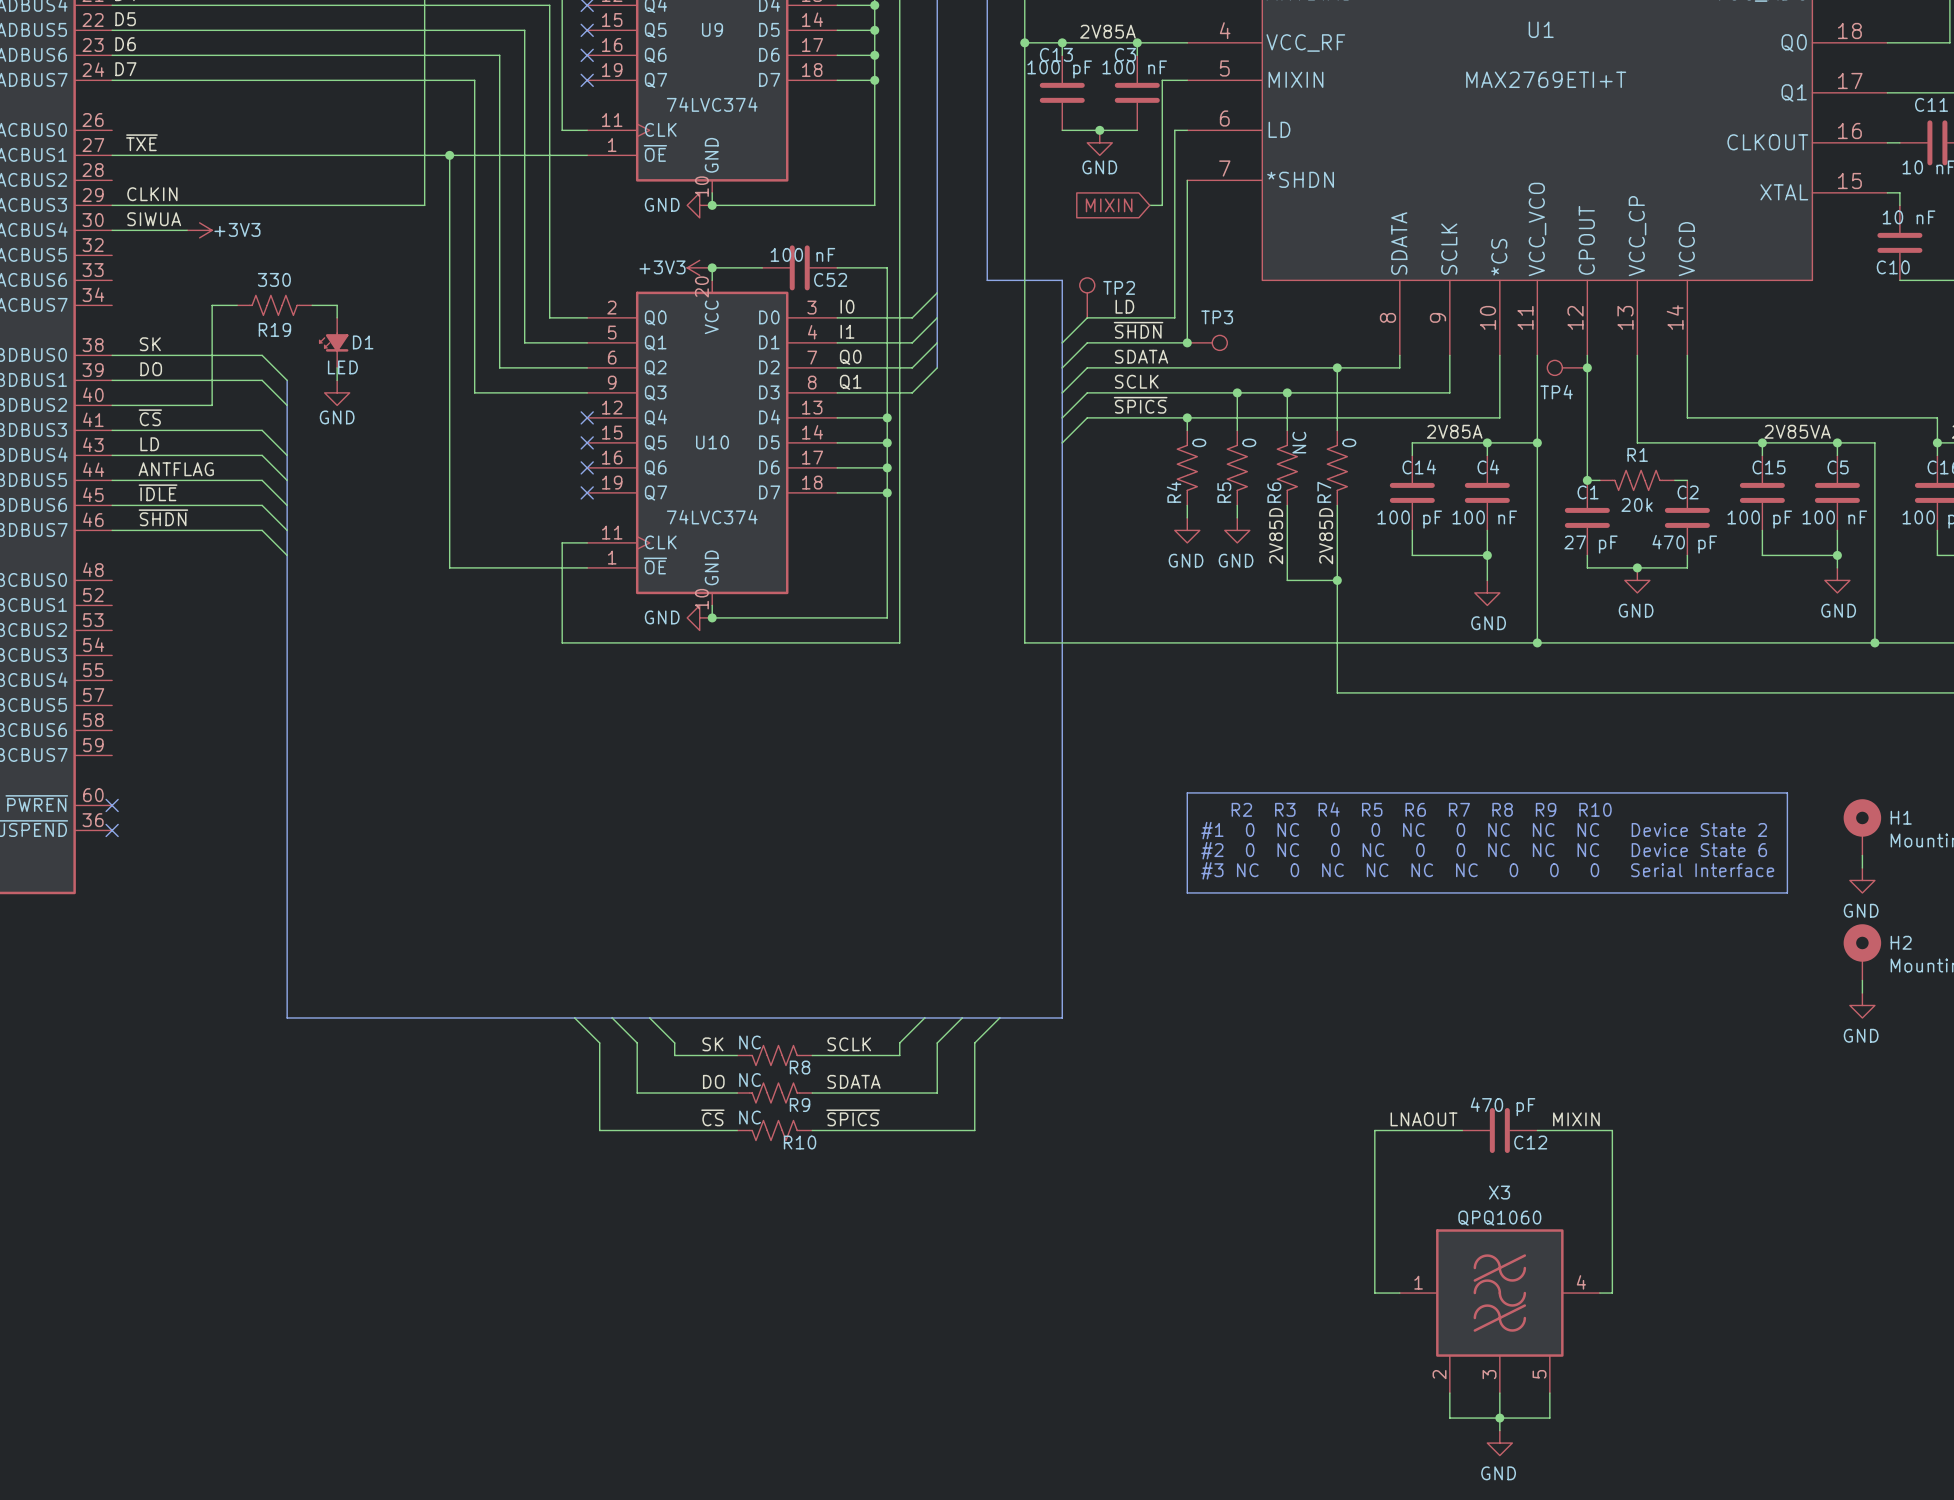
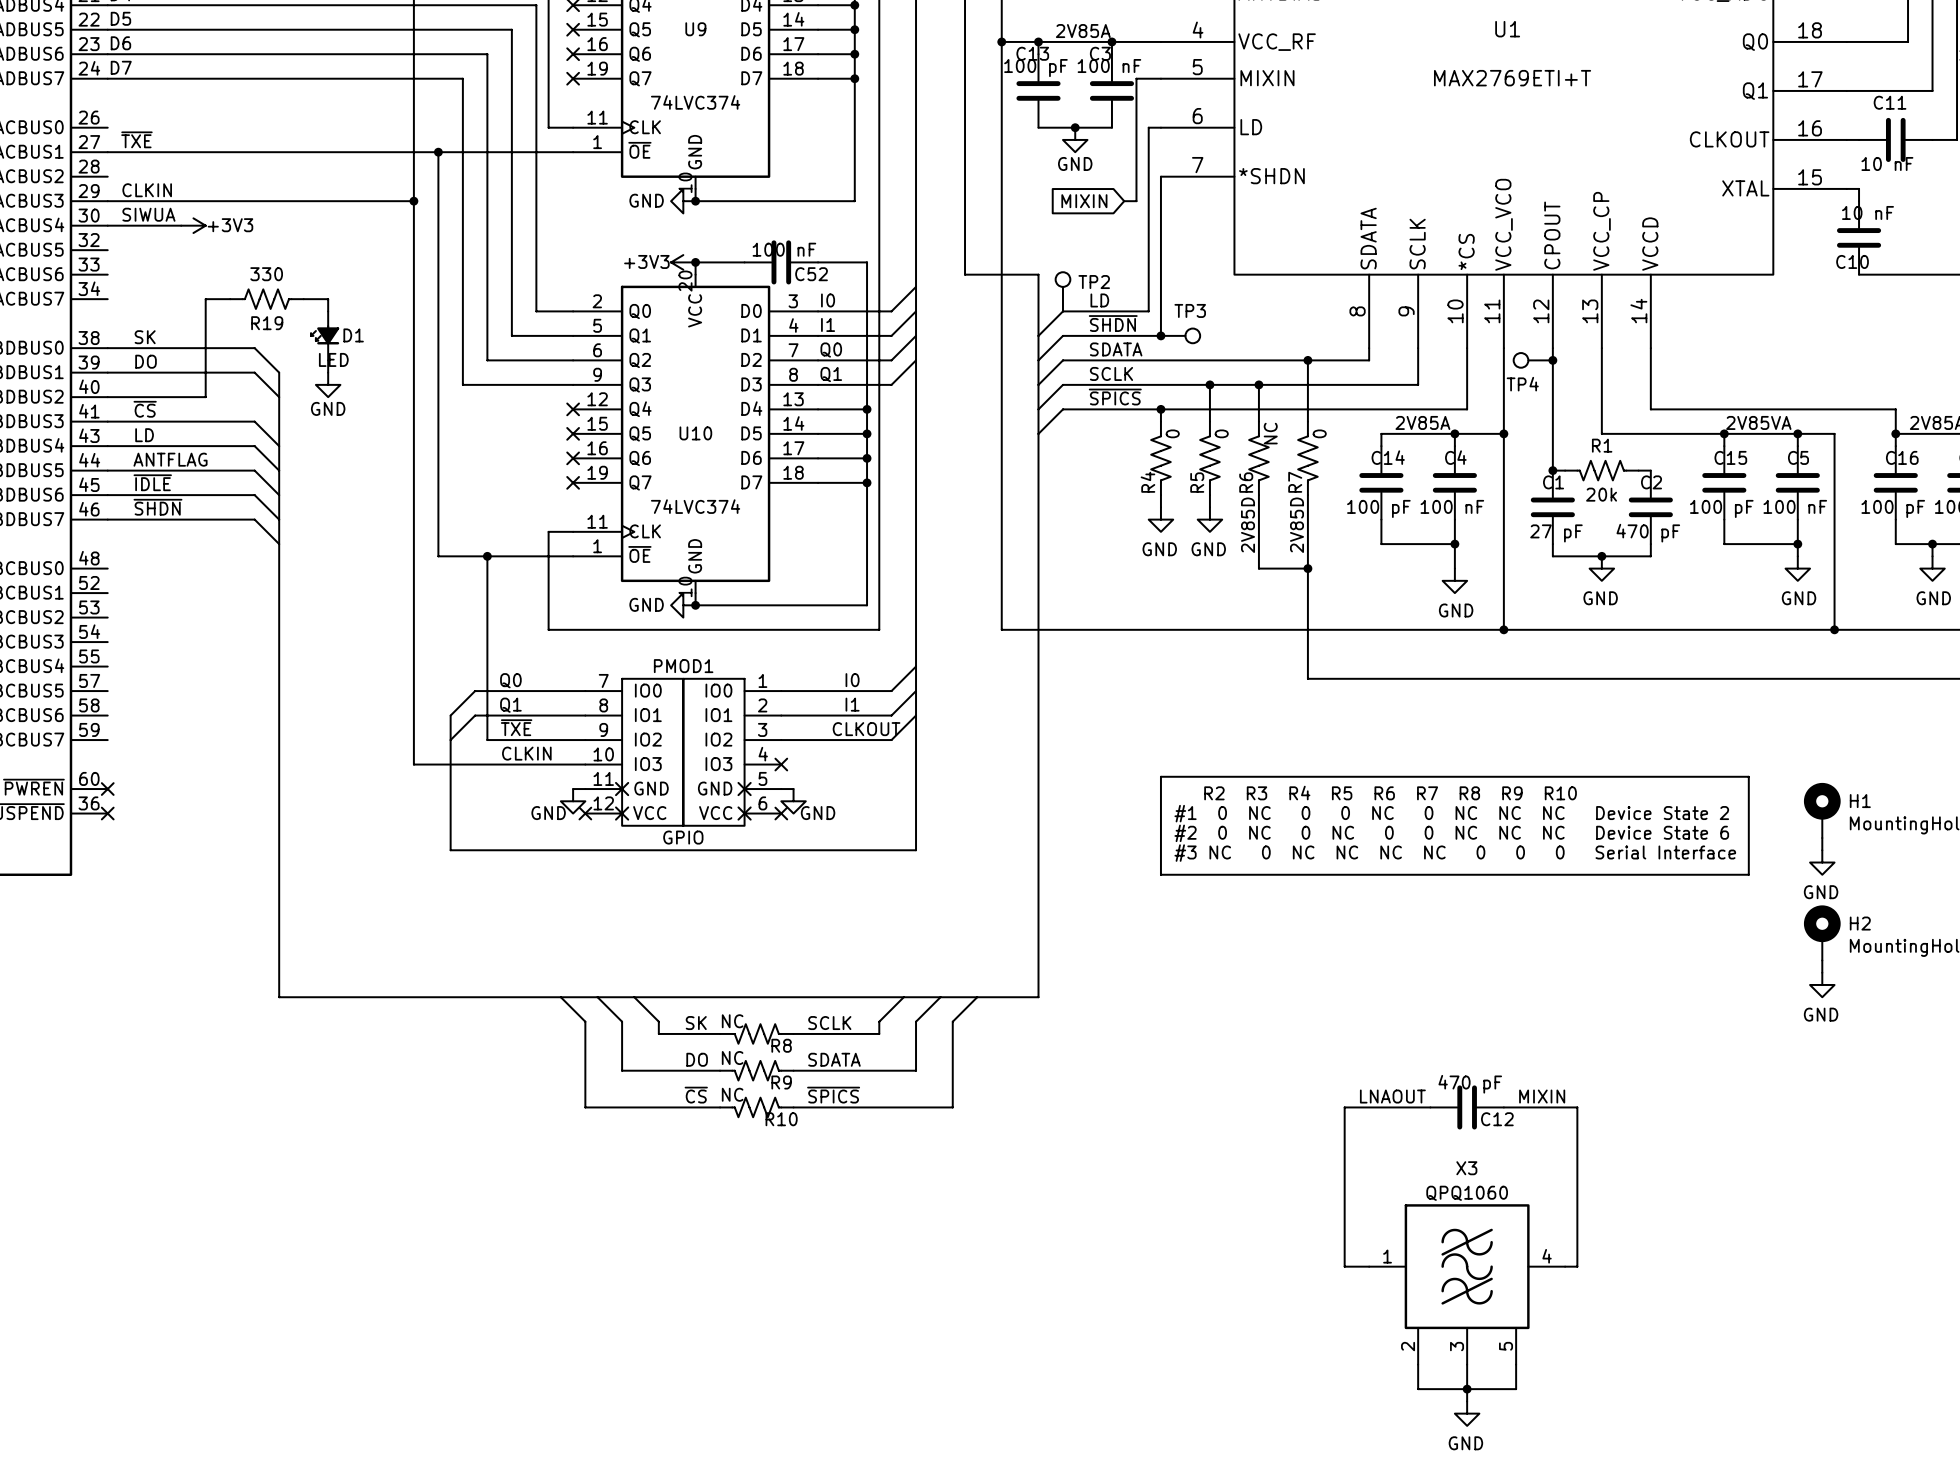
wire: none -> (413, 201) (413, 764) (585, 764)
junction: none -> (413, 201)
bus: none -> (916, 360) (916, 850) (450, 850) (450, 715)
wire: none -> (487, 556) (487, 740) (585, 740)
junction: none -> (487, 556)
wire: none -> (916, 666) (891, 691) (781, 691)
label: none -> Q0 (510, 680)
label: none -> I0 (852, 680)
wire: none -> (585, 691) (475, 691) (450, 715)
wire: none -> (916, 691) (891, 715) (781, 715)
label: none -> Q1 (510, 705)
label: none -> I1 (852, 704)
wire: none -> (585, 715) (475, 715) (450, 740)
wire: none -> (916, 715) (891, 740) (781, 740)
label: none -> ~{TXE} (516, 727)
label: none -> CLKOUT (866, 729)
PMOD1: none -> (683, 752)
label: none -> CLKIN (526, 753)
no-connect mark: none -> (781, 764)
wire: none -> (573, 789) (585, 789)
wire: none -> (781, 789) (793, 789)
power symbol: none -> GND (573, 801)
power symbol: none -> GND (793, 801)
no-connect mark: none -> (585, 813)
no-connect mark: none -> (781, 813)

